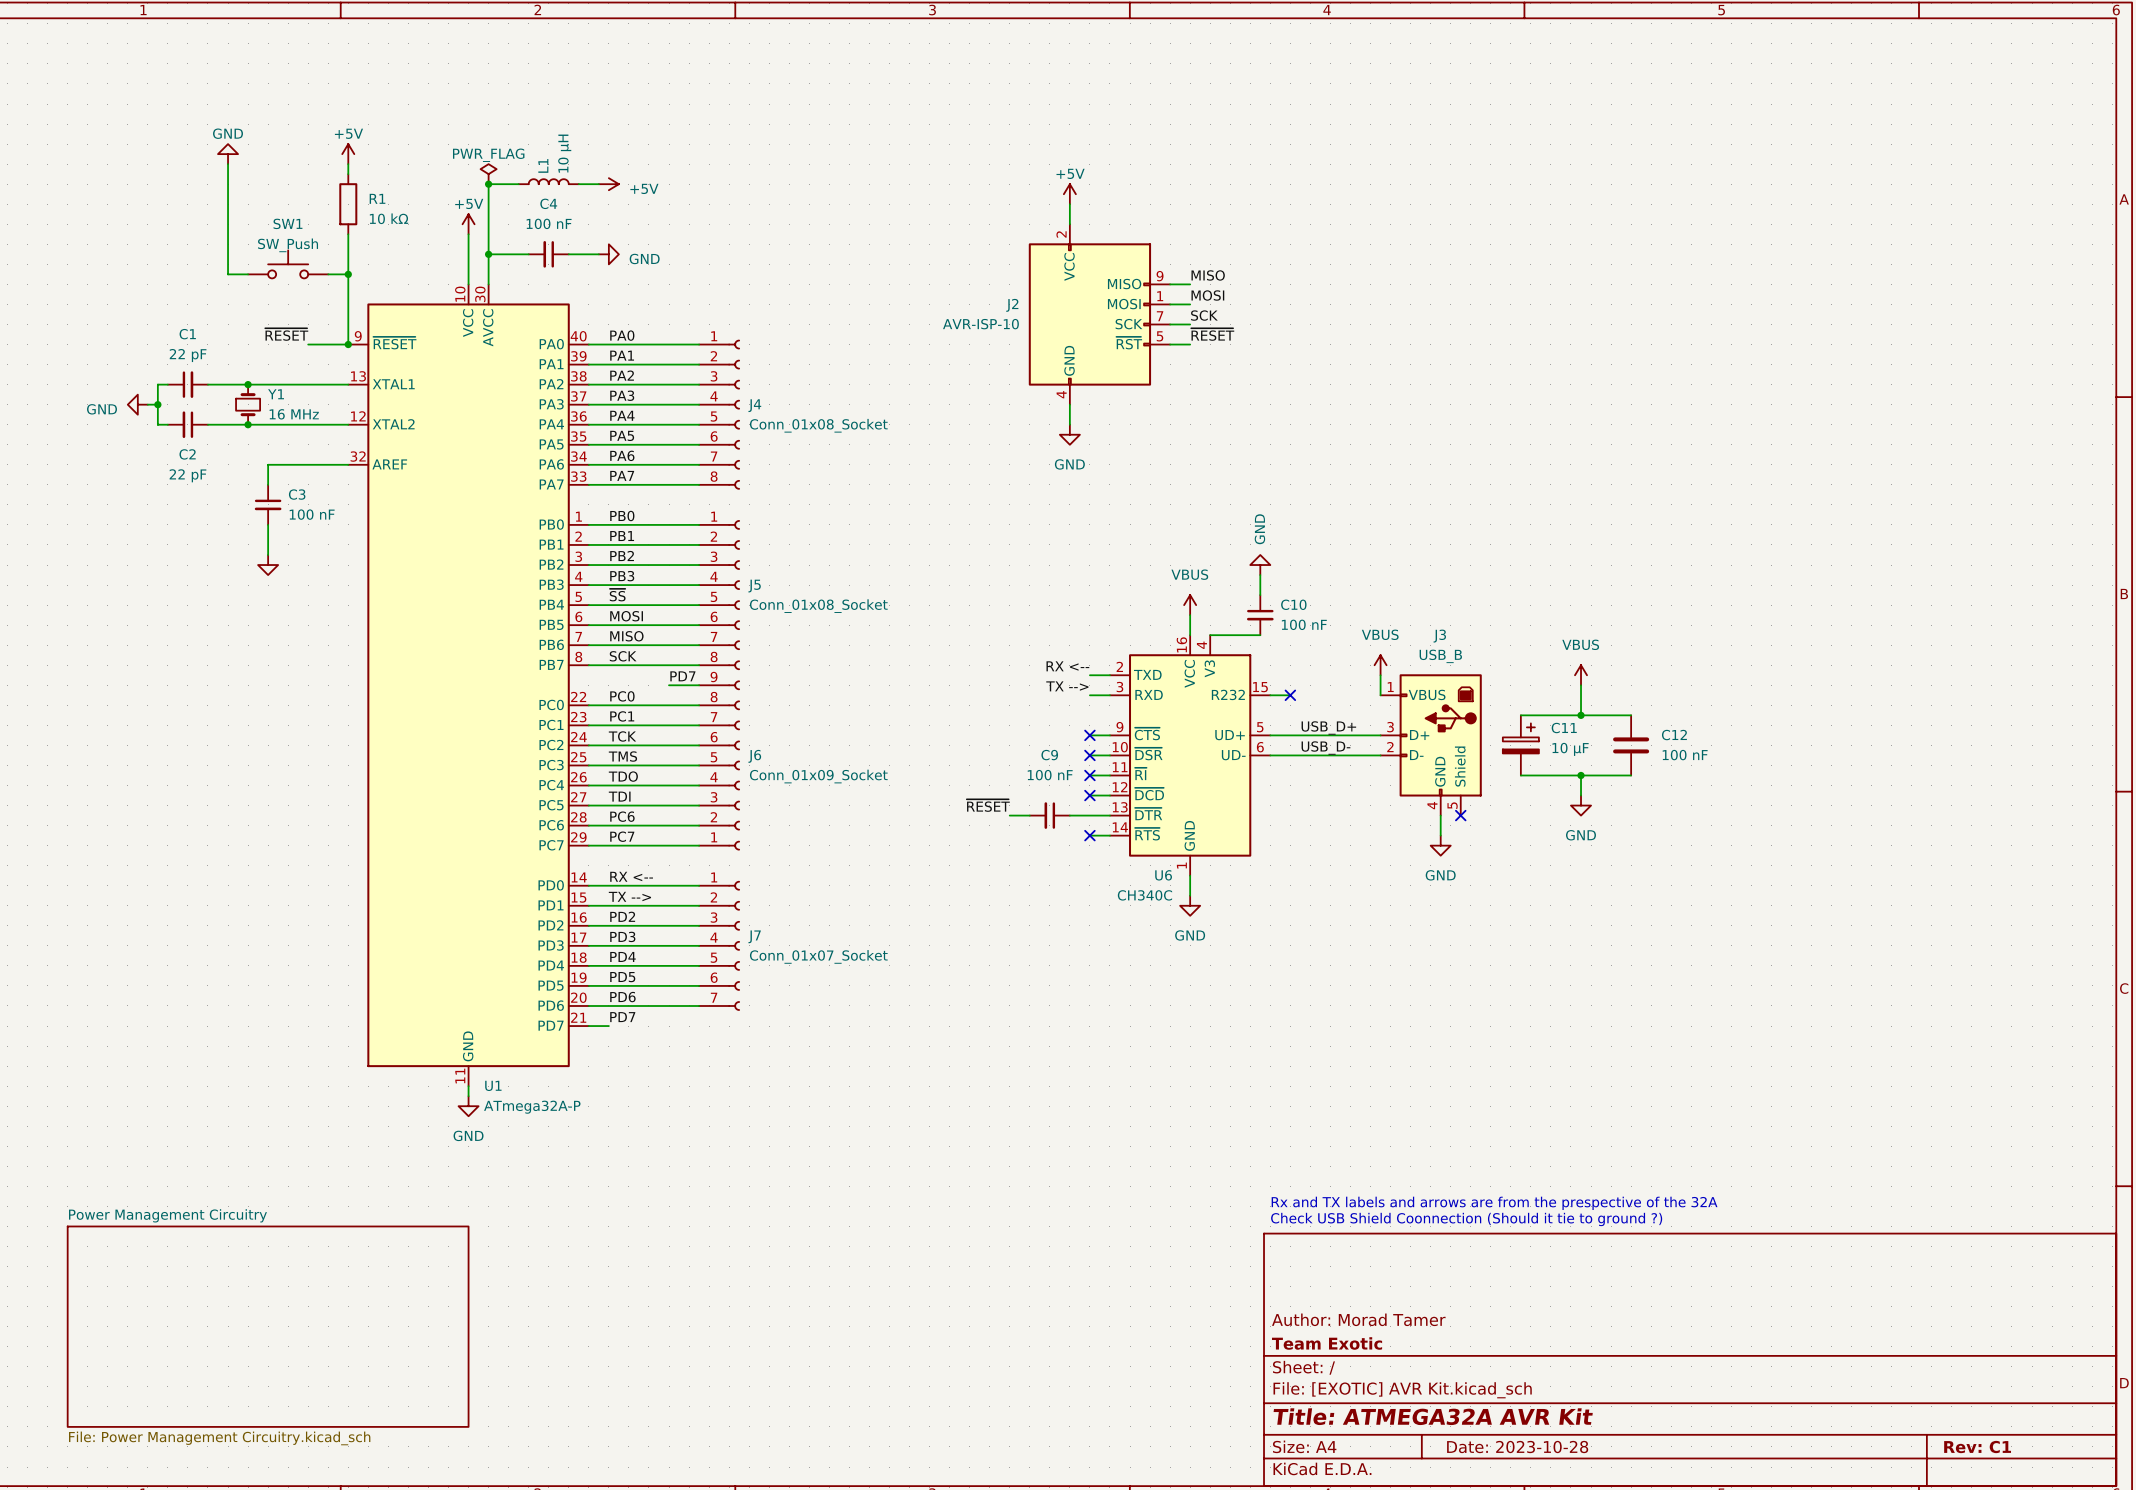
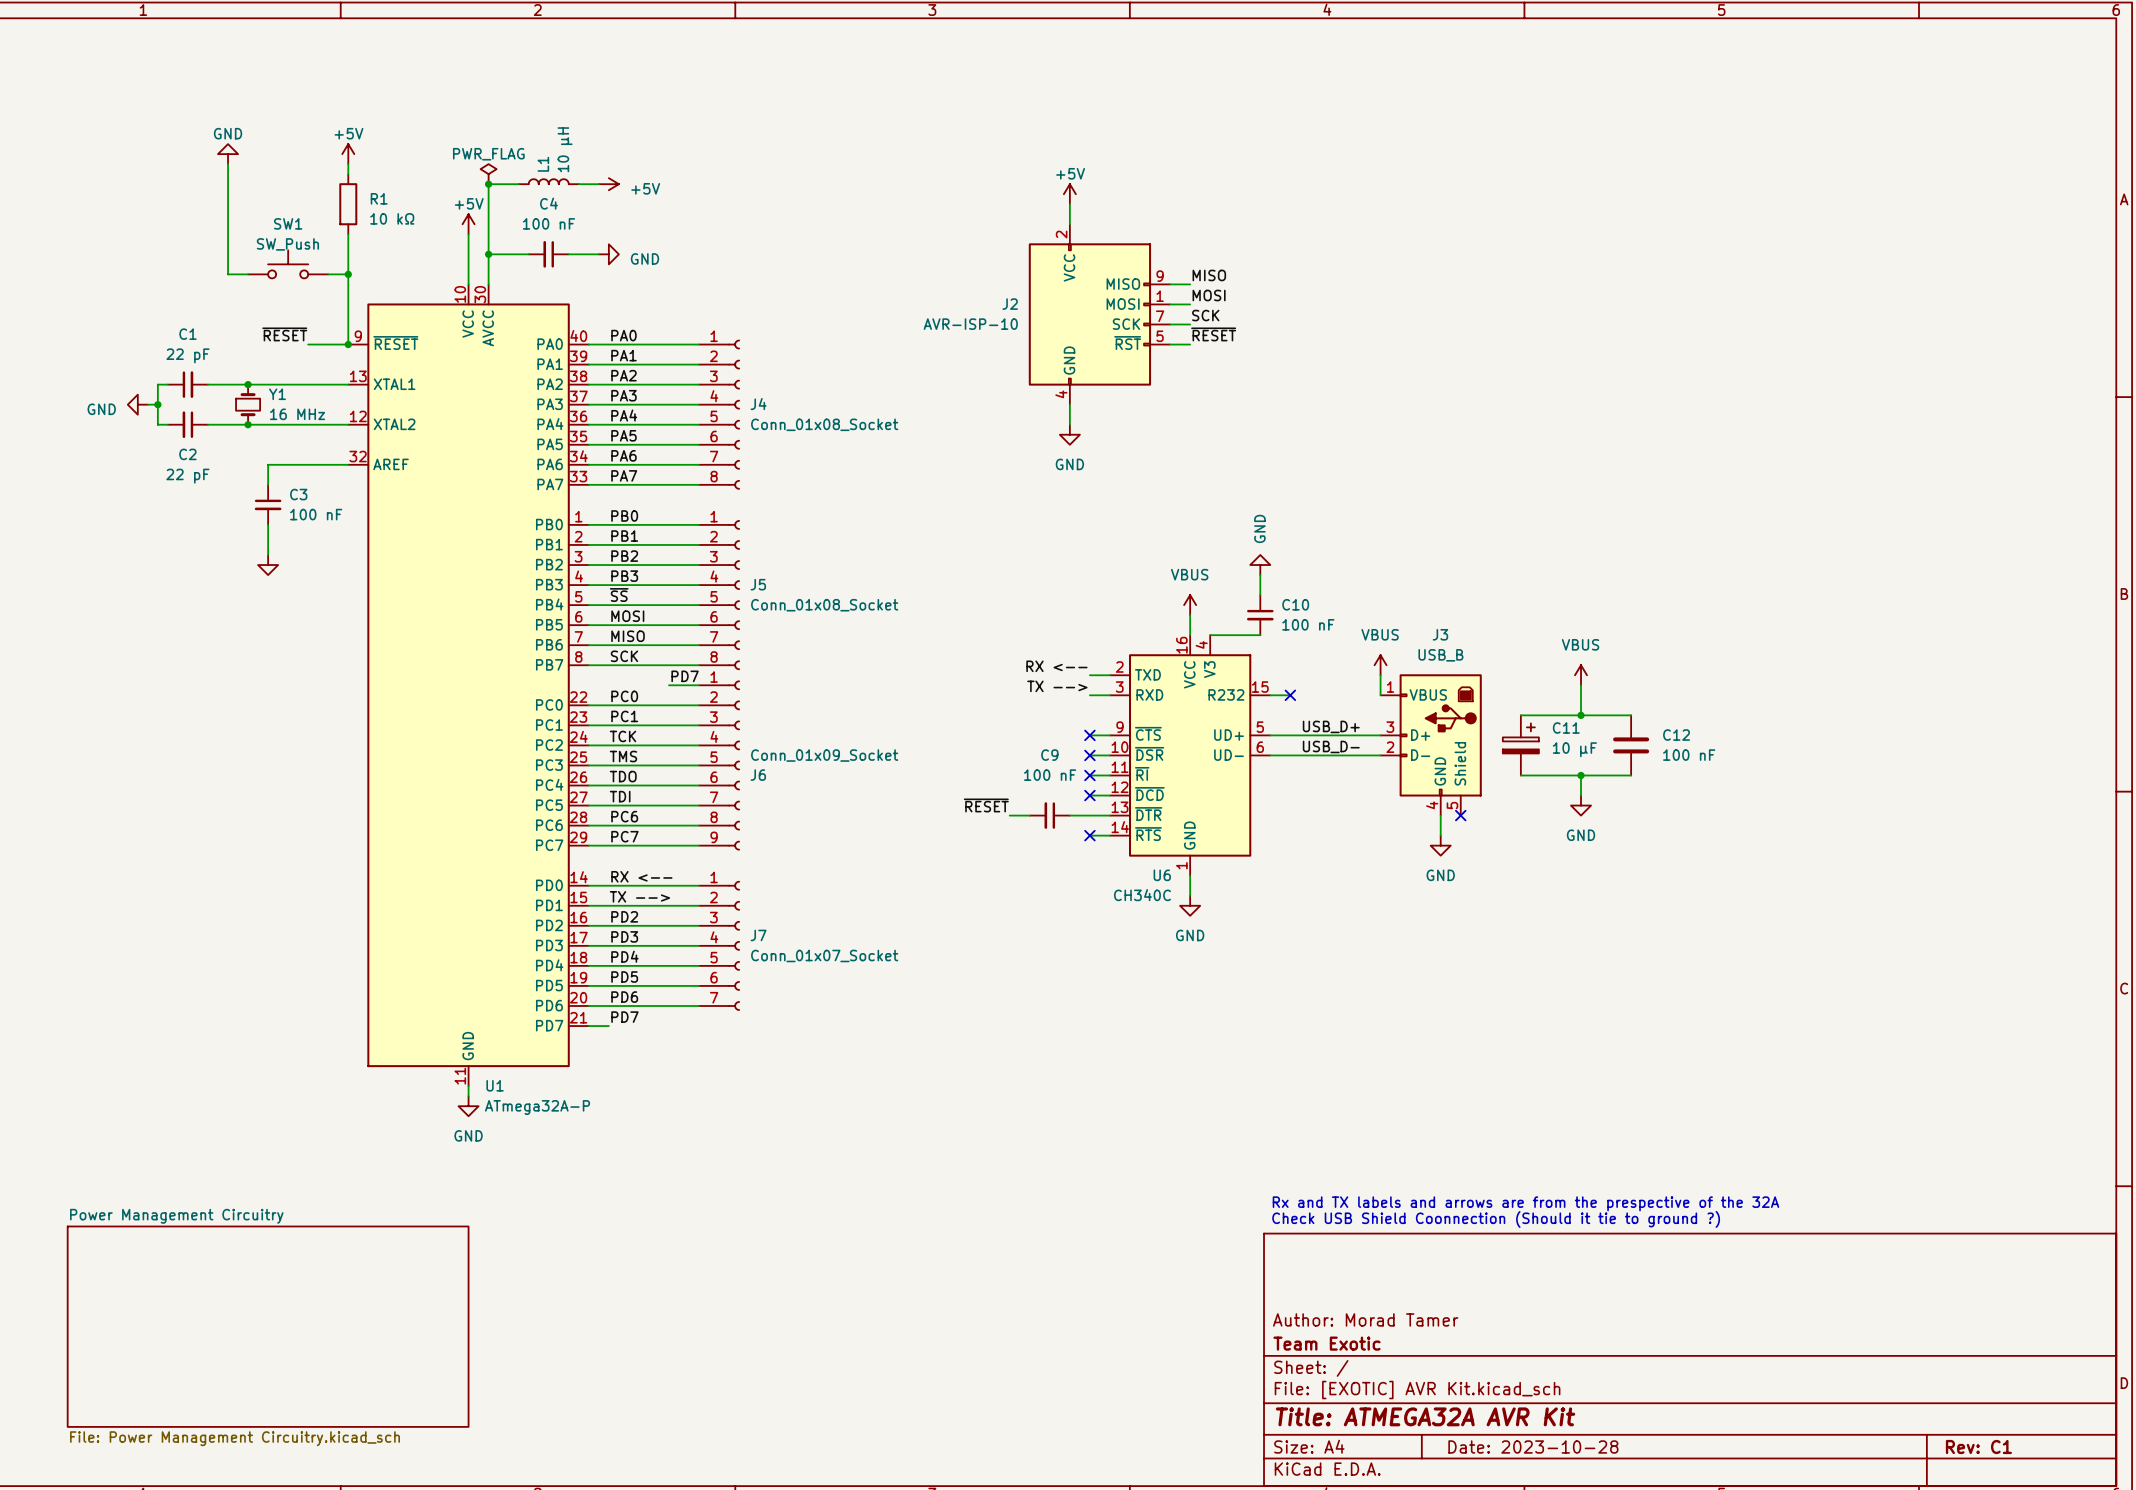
J6 flip: as is (734, 765) -> up-down (734, 765)

